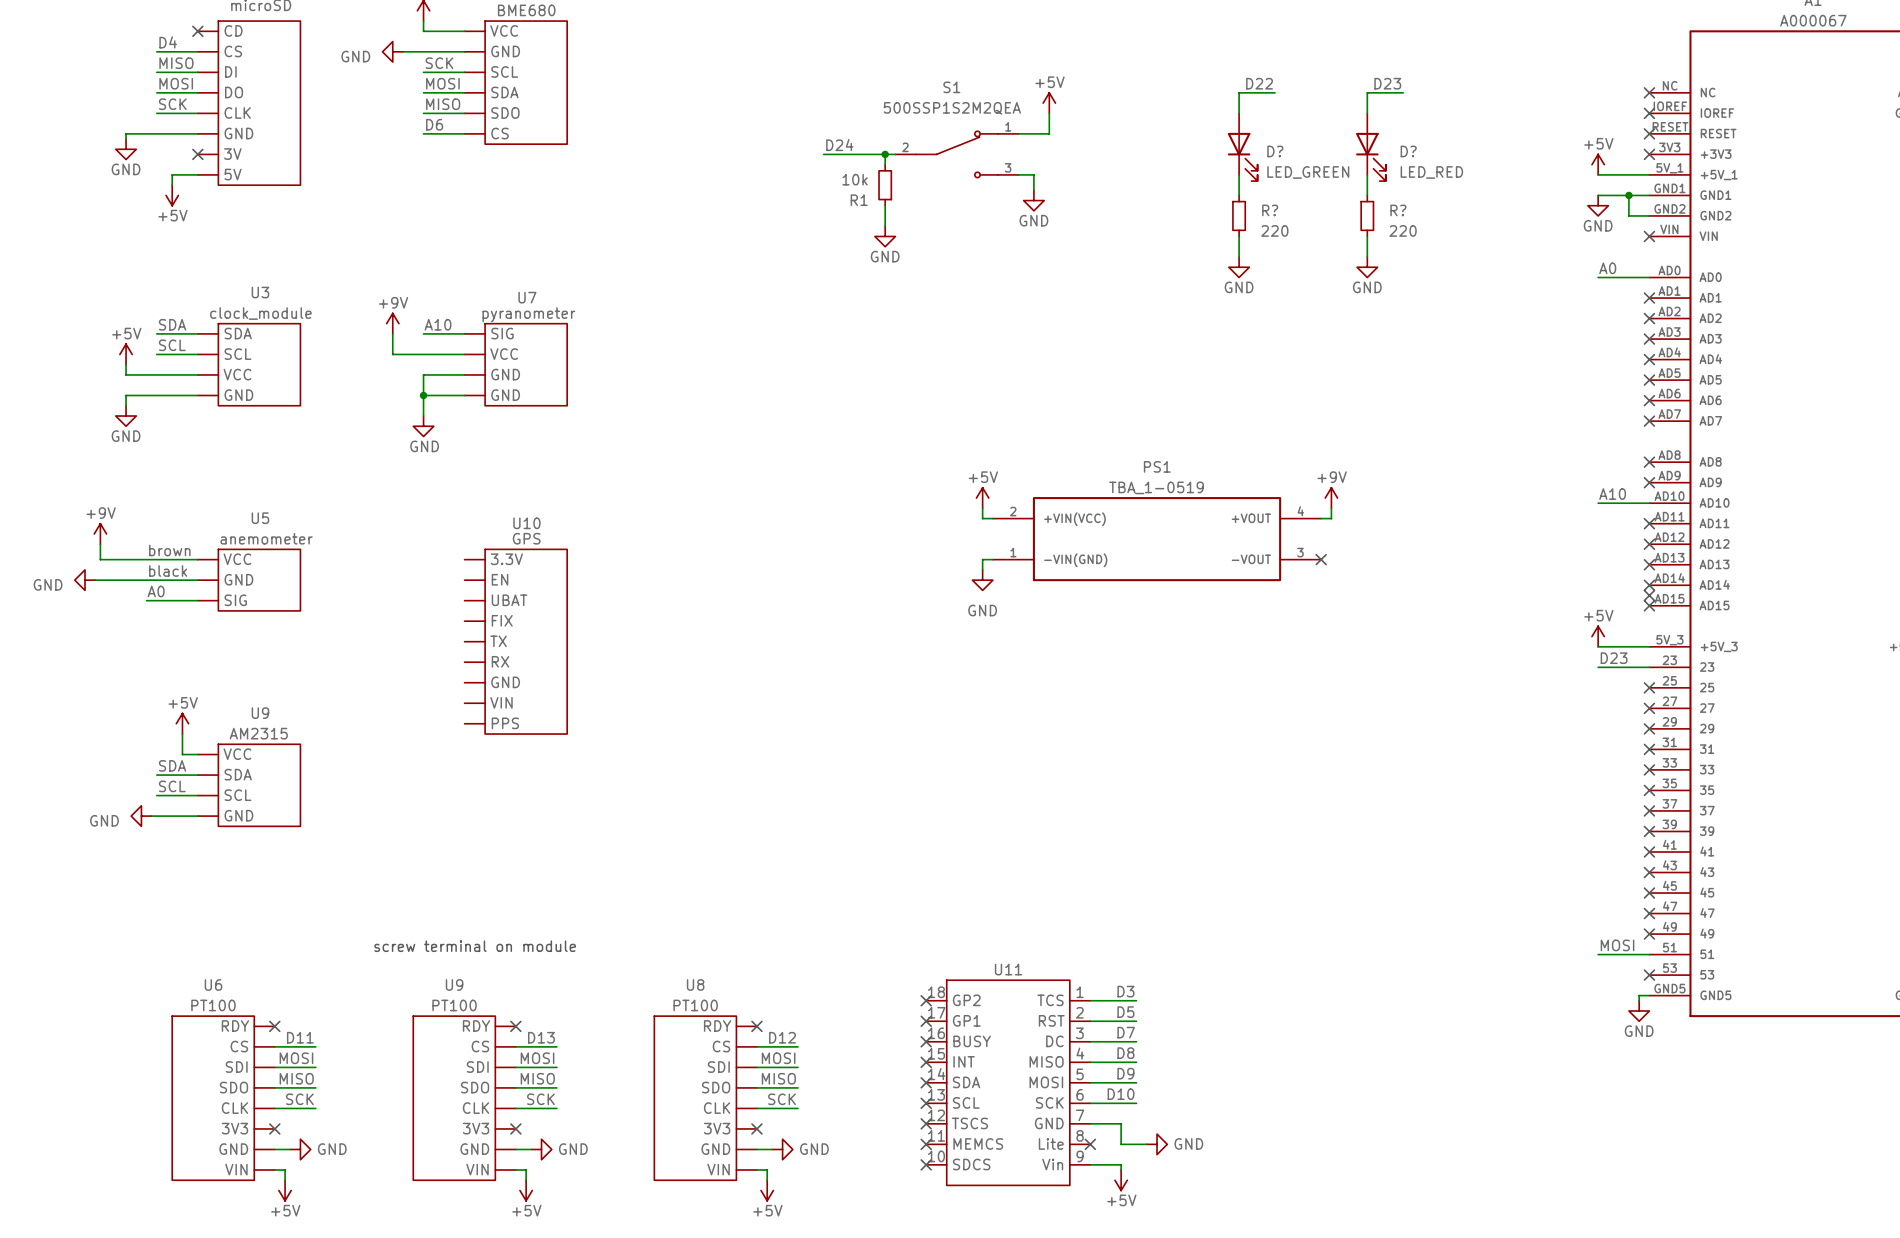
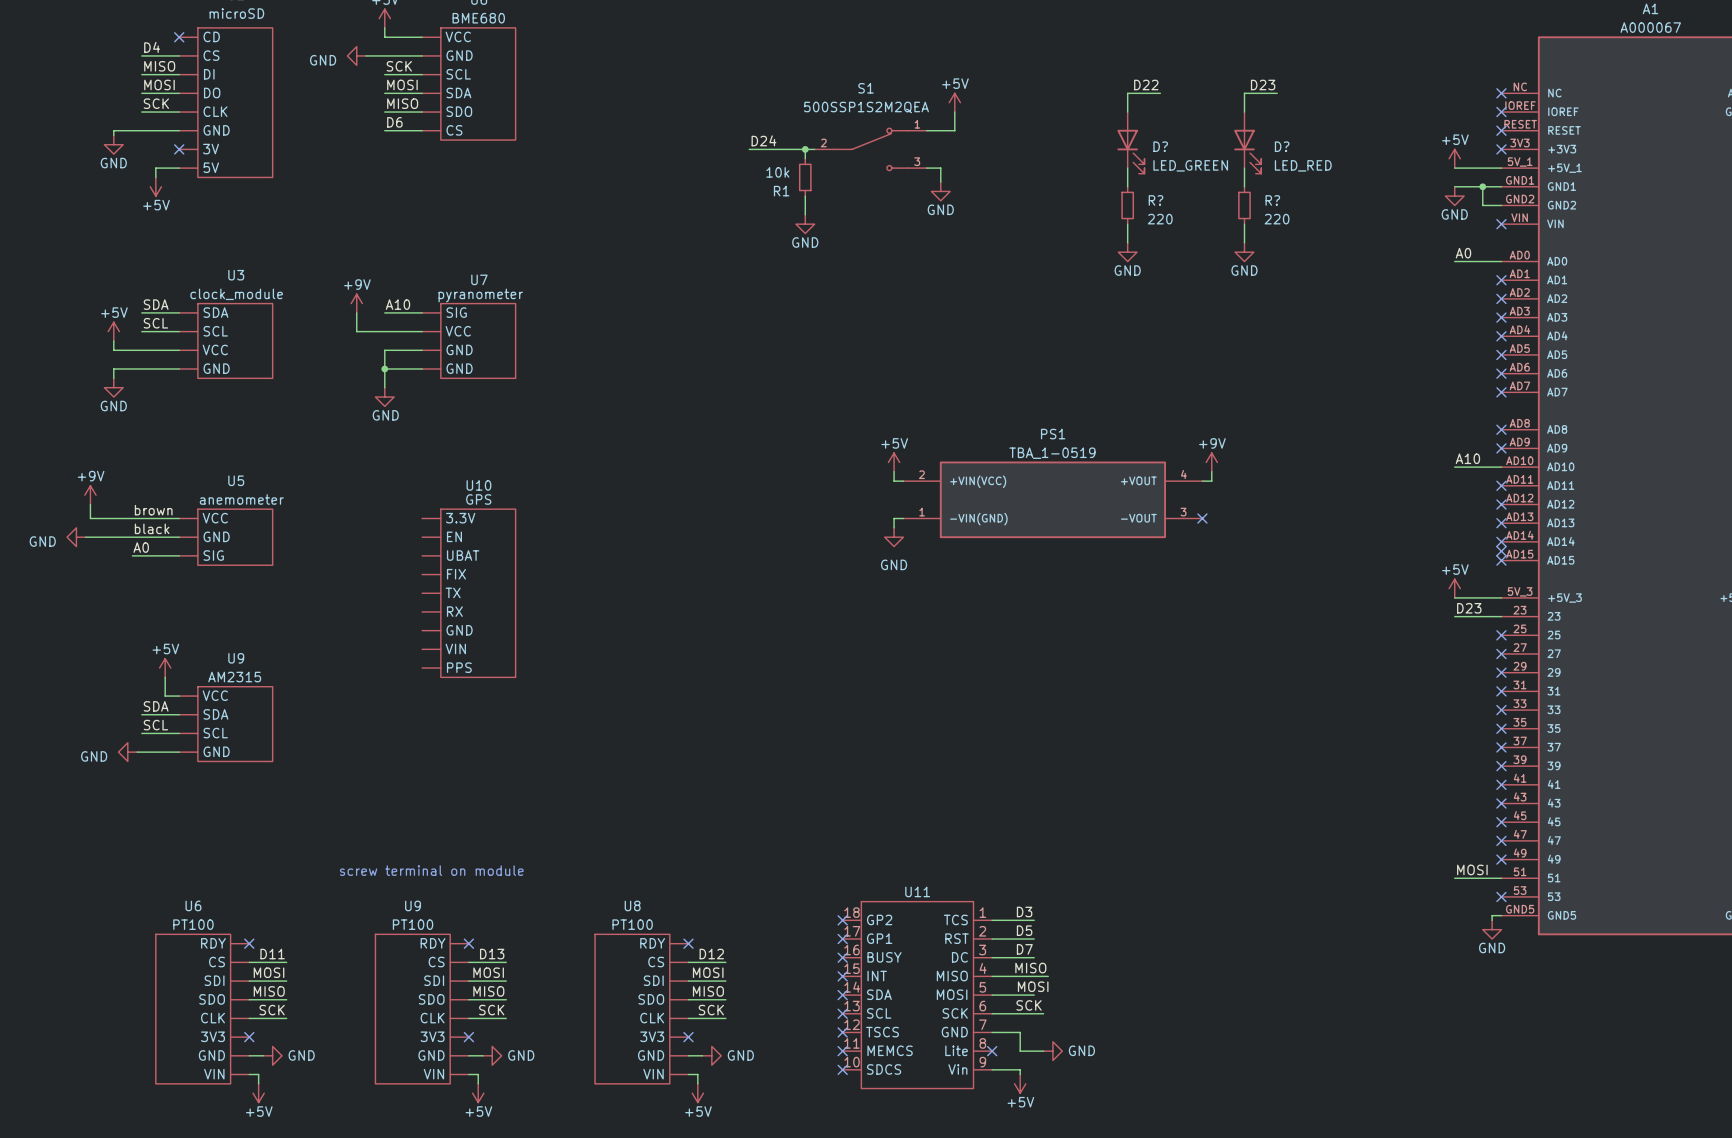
label: D8 (1125, 1053) -> none
label: none -> MISO (1030, 968)
wire: none -> (1034, 976) (1048, 976)
label: D9 (1125, 1073) -> none
label: none -> MOSI (1033, 986)
label: D10 (1121, 1094) -> none
label: none -> SCK (1029, 1005)
wire: none -> (1034, 1013) (1043, 1013)

